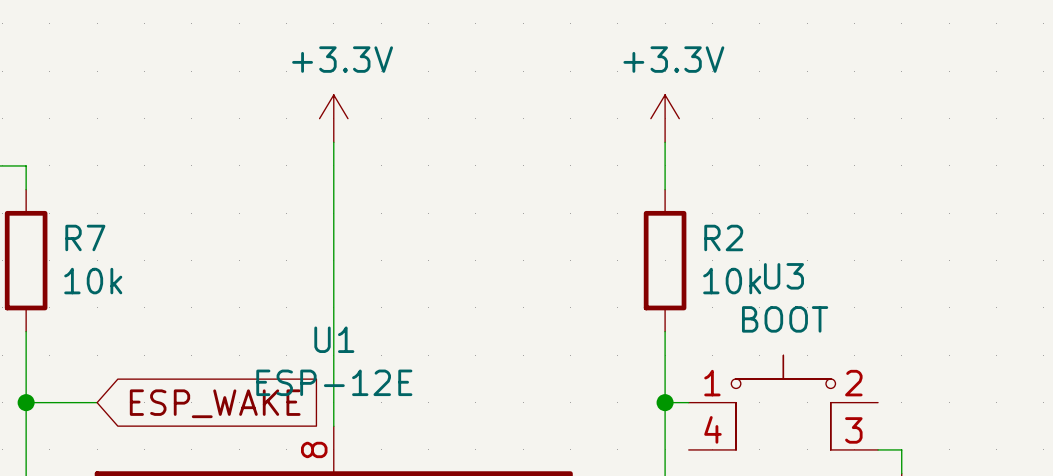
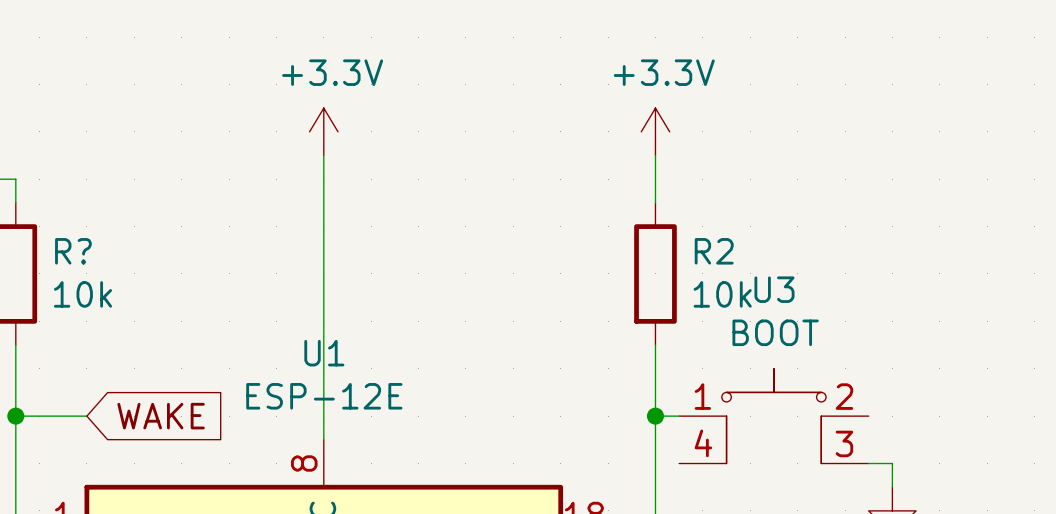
R7 name: R7 (85, 237) -> R? (73, 251)
global label: ESP_WAKE (215, 403) -> WAKE (161, 416)

